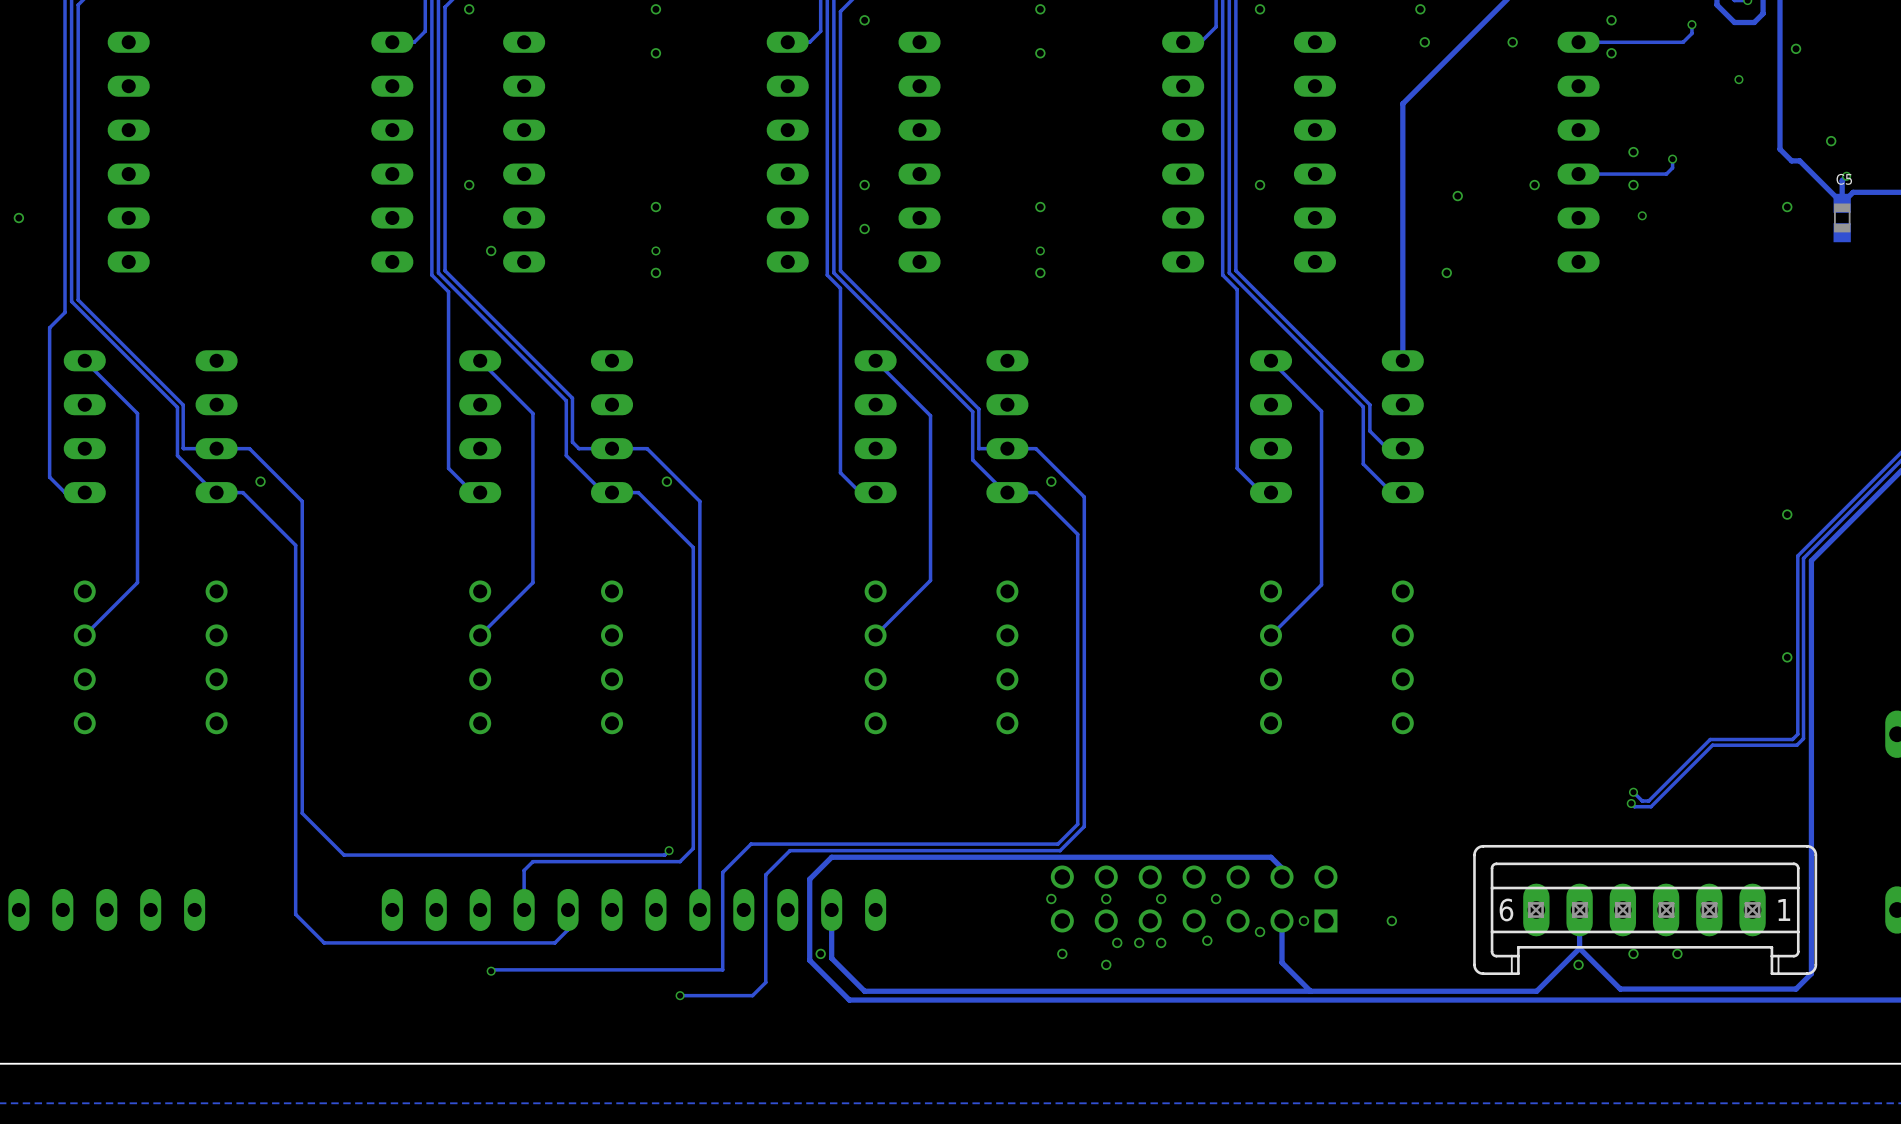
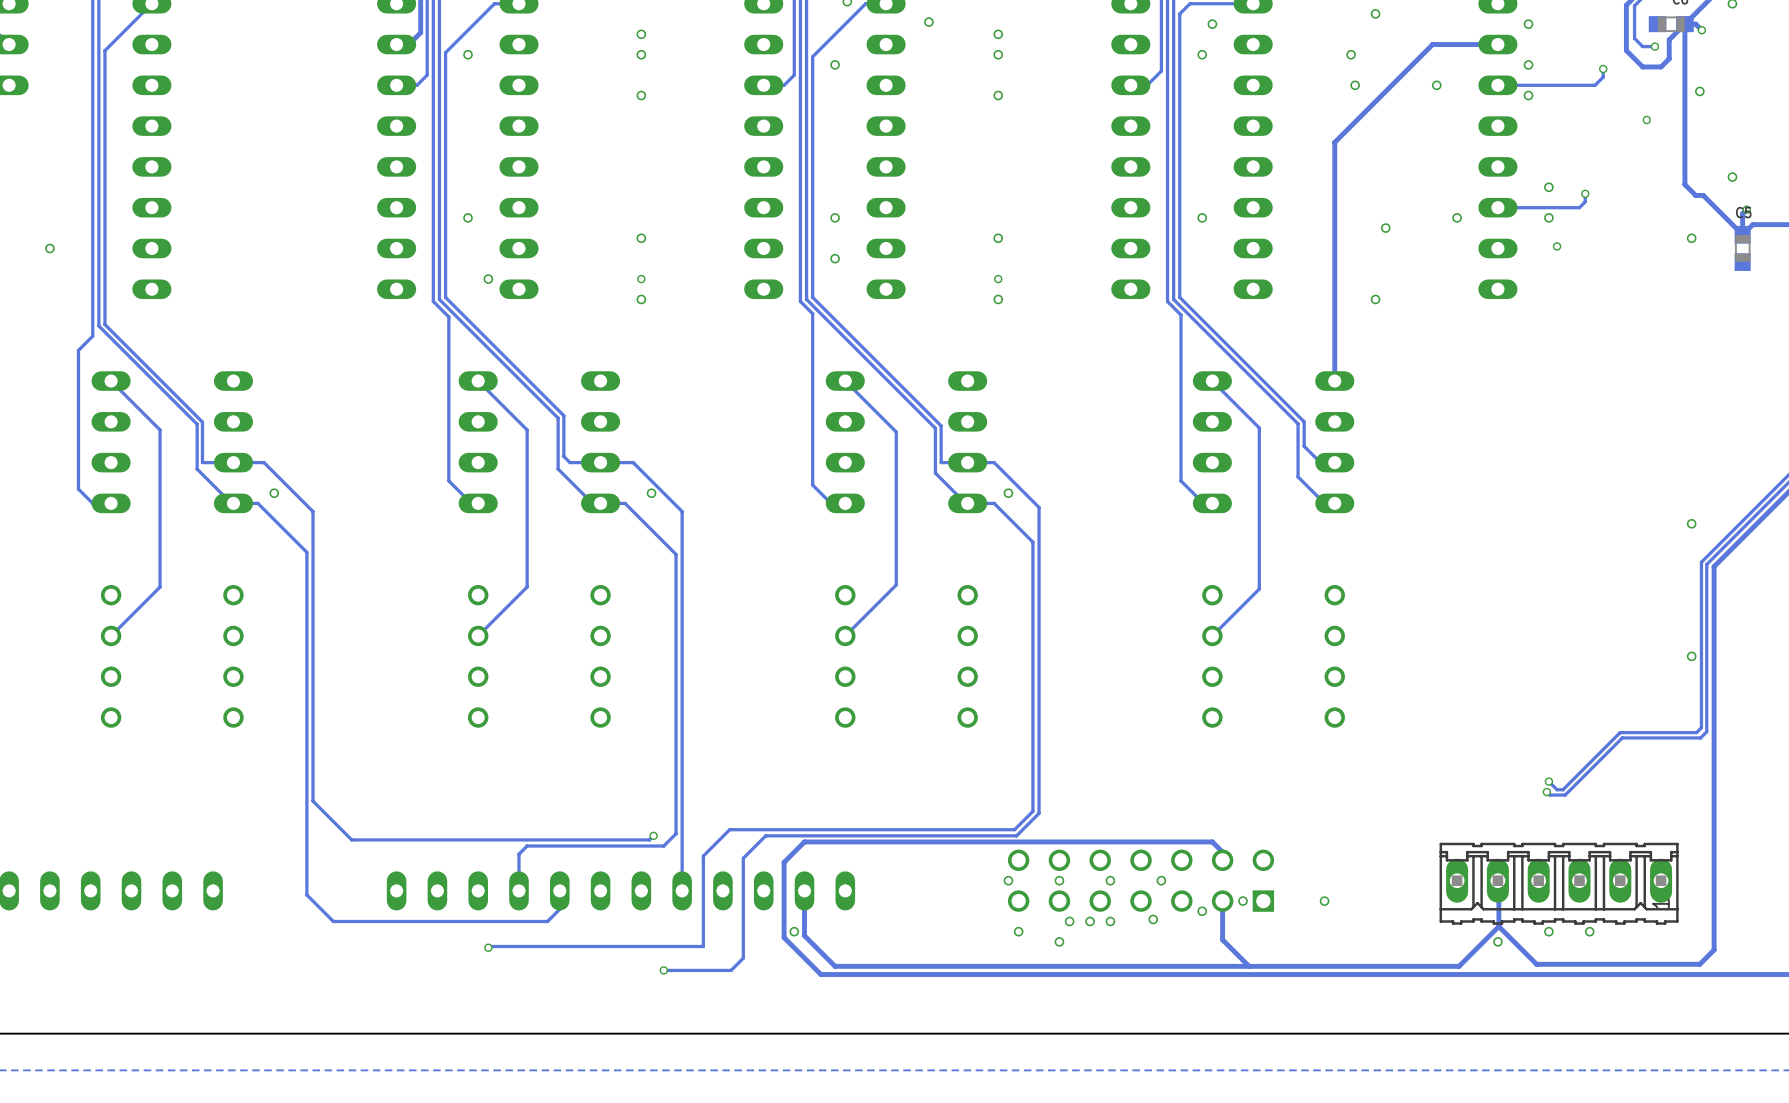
part footprint: [1473, 844, 1818, 976] -> [1439, 842, 1679, 925]

